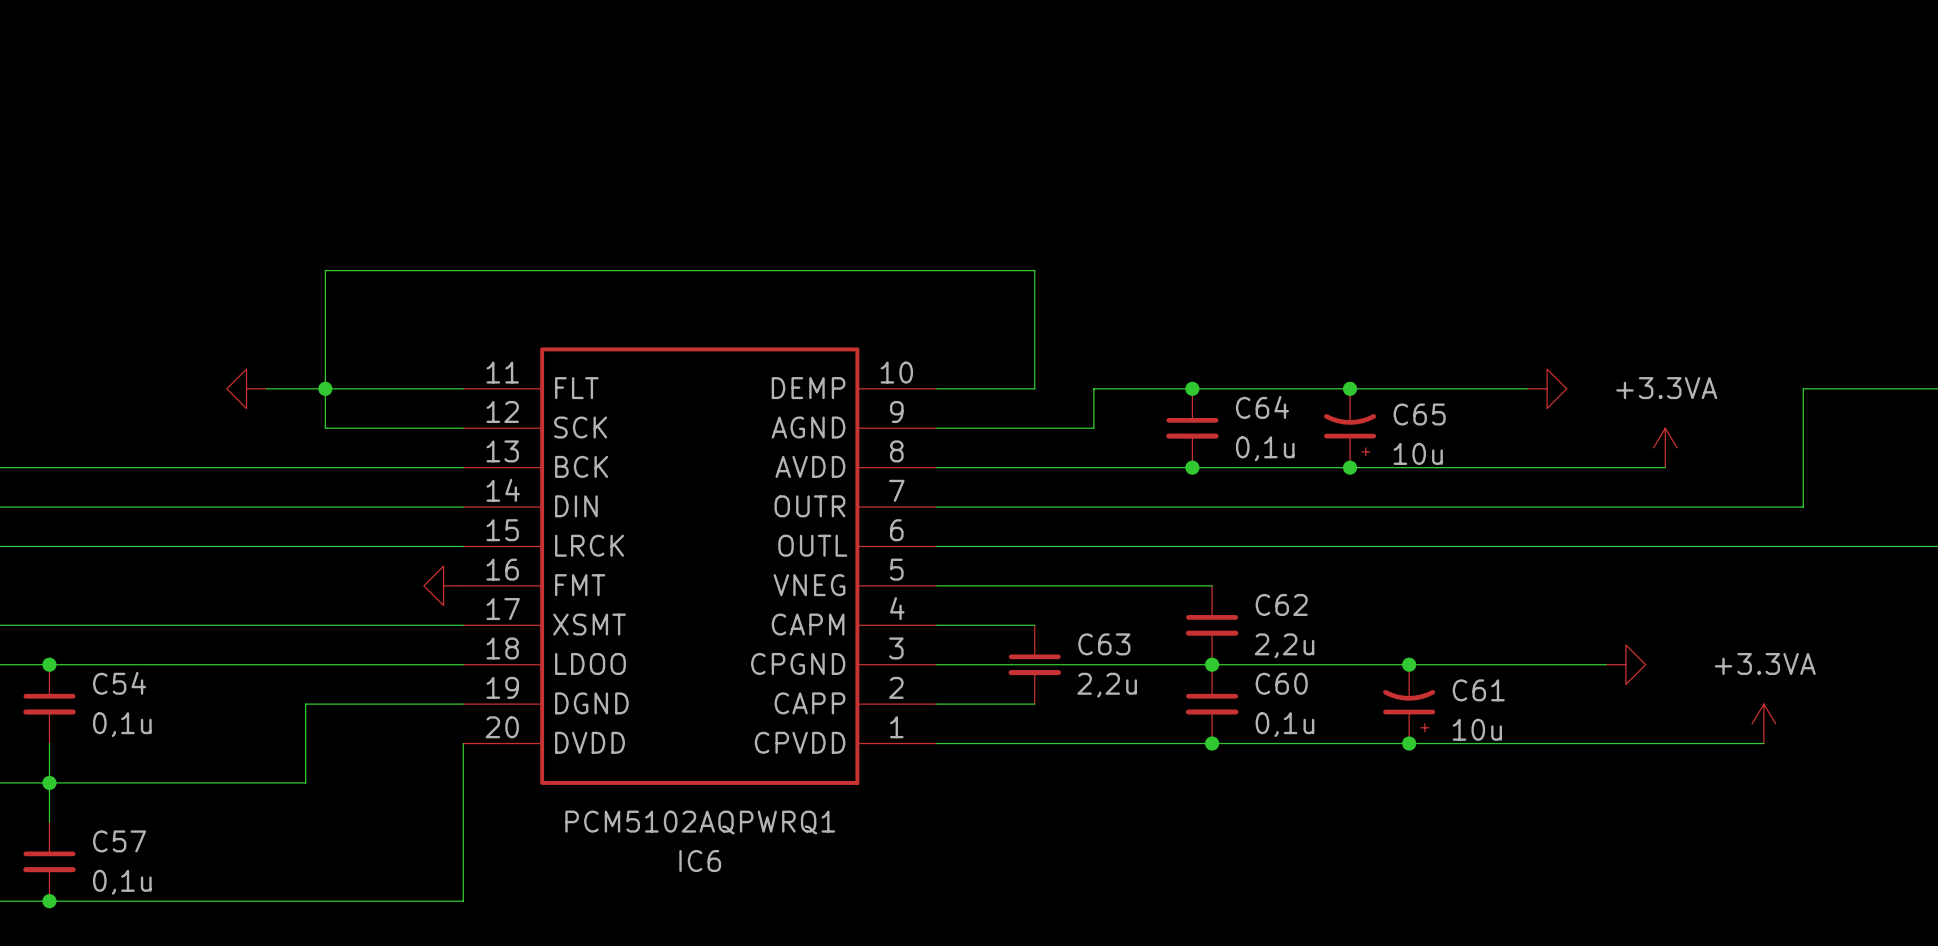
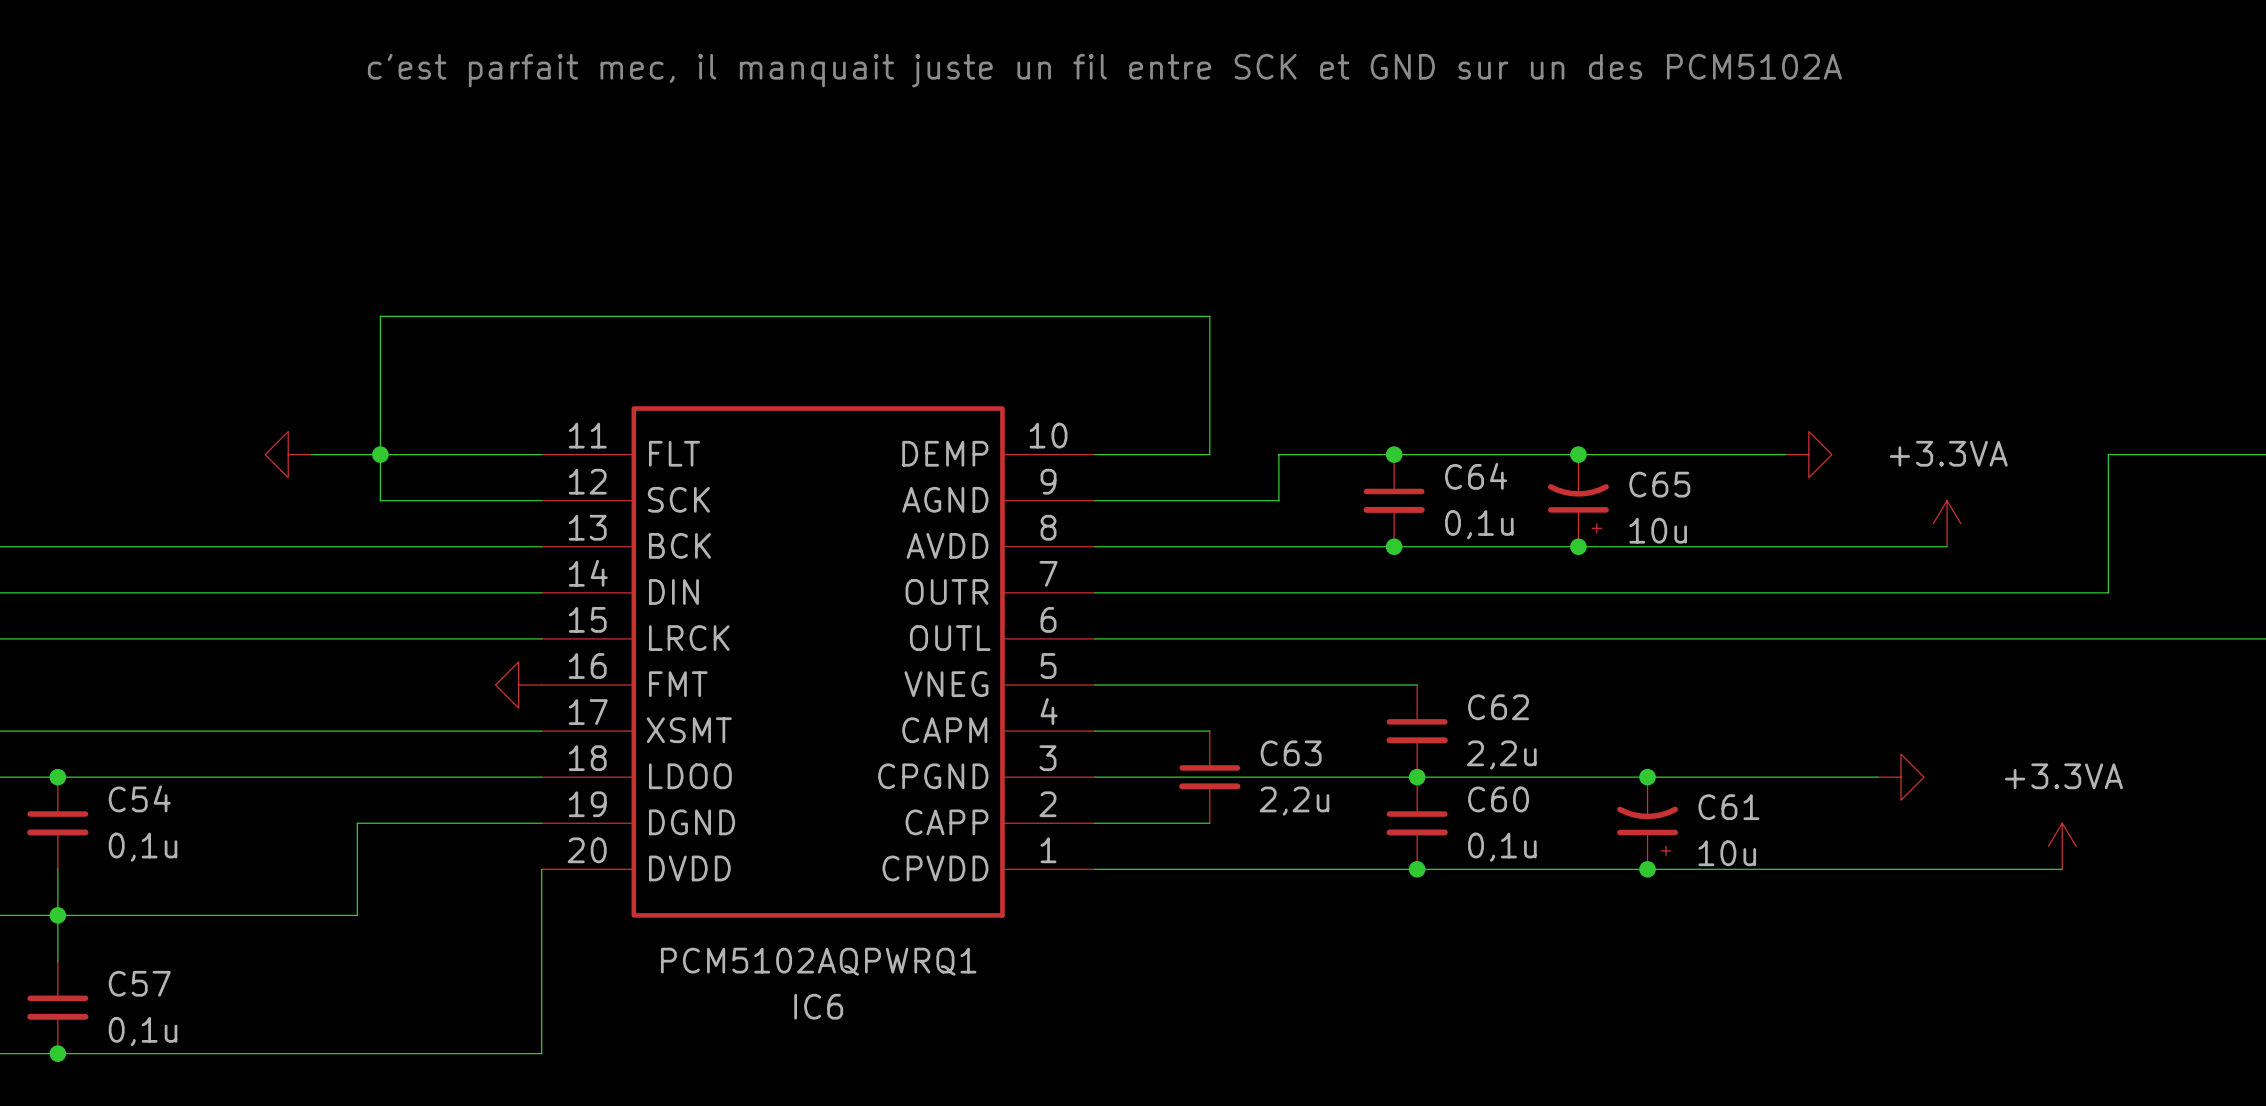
text: none -> c'est parfait mec, il manquait juste un fil entre SCK et GND sur un des PCM5102A (1104, 70)

